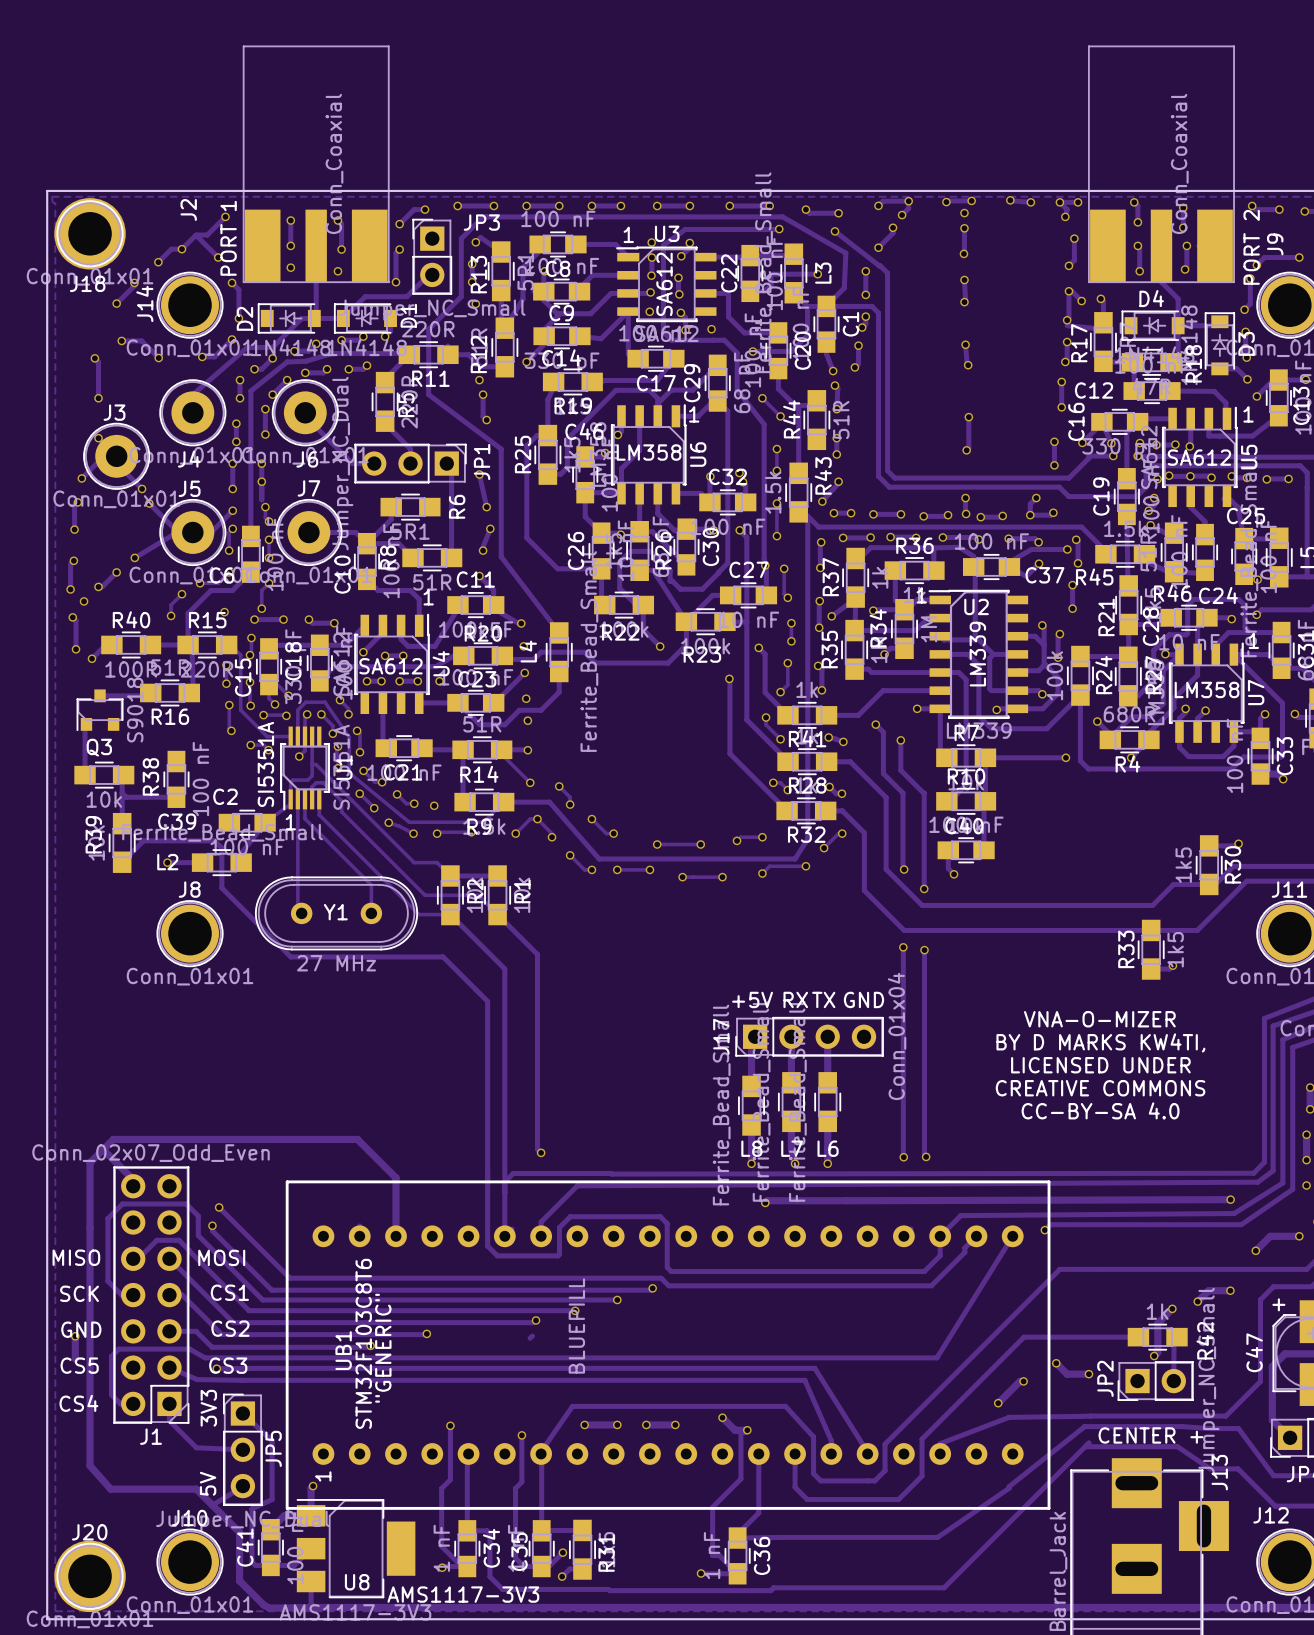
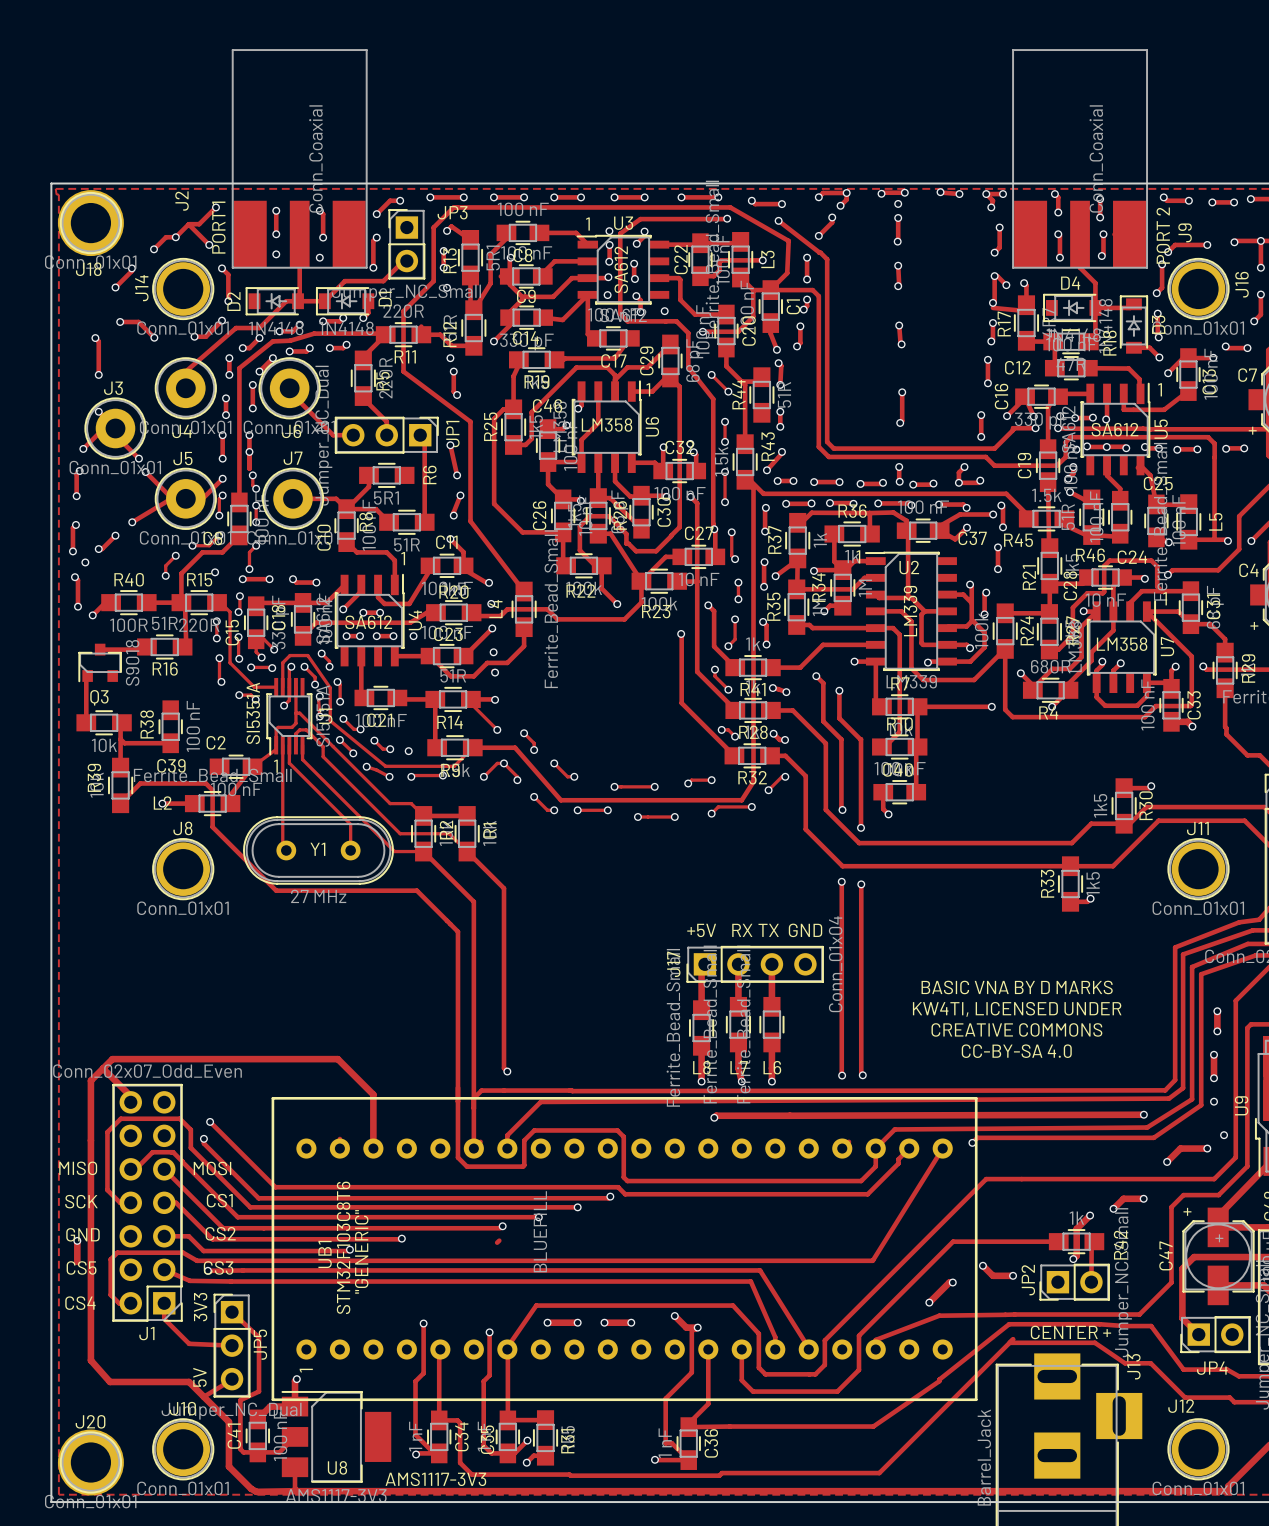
text: VNA-O-MIZER (1099, 1019) -> none
text: BY D MARKS KW4TI, (1100, 1042) -> none
text: LICENSED UNDER (1100, 1065) -> BASIC VNA BY D MARKS (1017, 987)
text: CREATIVE COMMONS (1100, 1088) -> KW4TI, LICENSED UNDER (1017, 1009)
text: CC-BY-SA 4.0 (1100, 1110) -> CREATIVE COMMONS (1016, 1029)
text: none -> CC-BY-SA 4.0 (1016, 1051)

